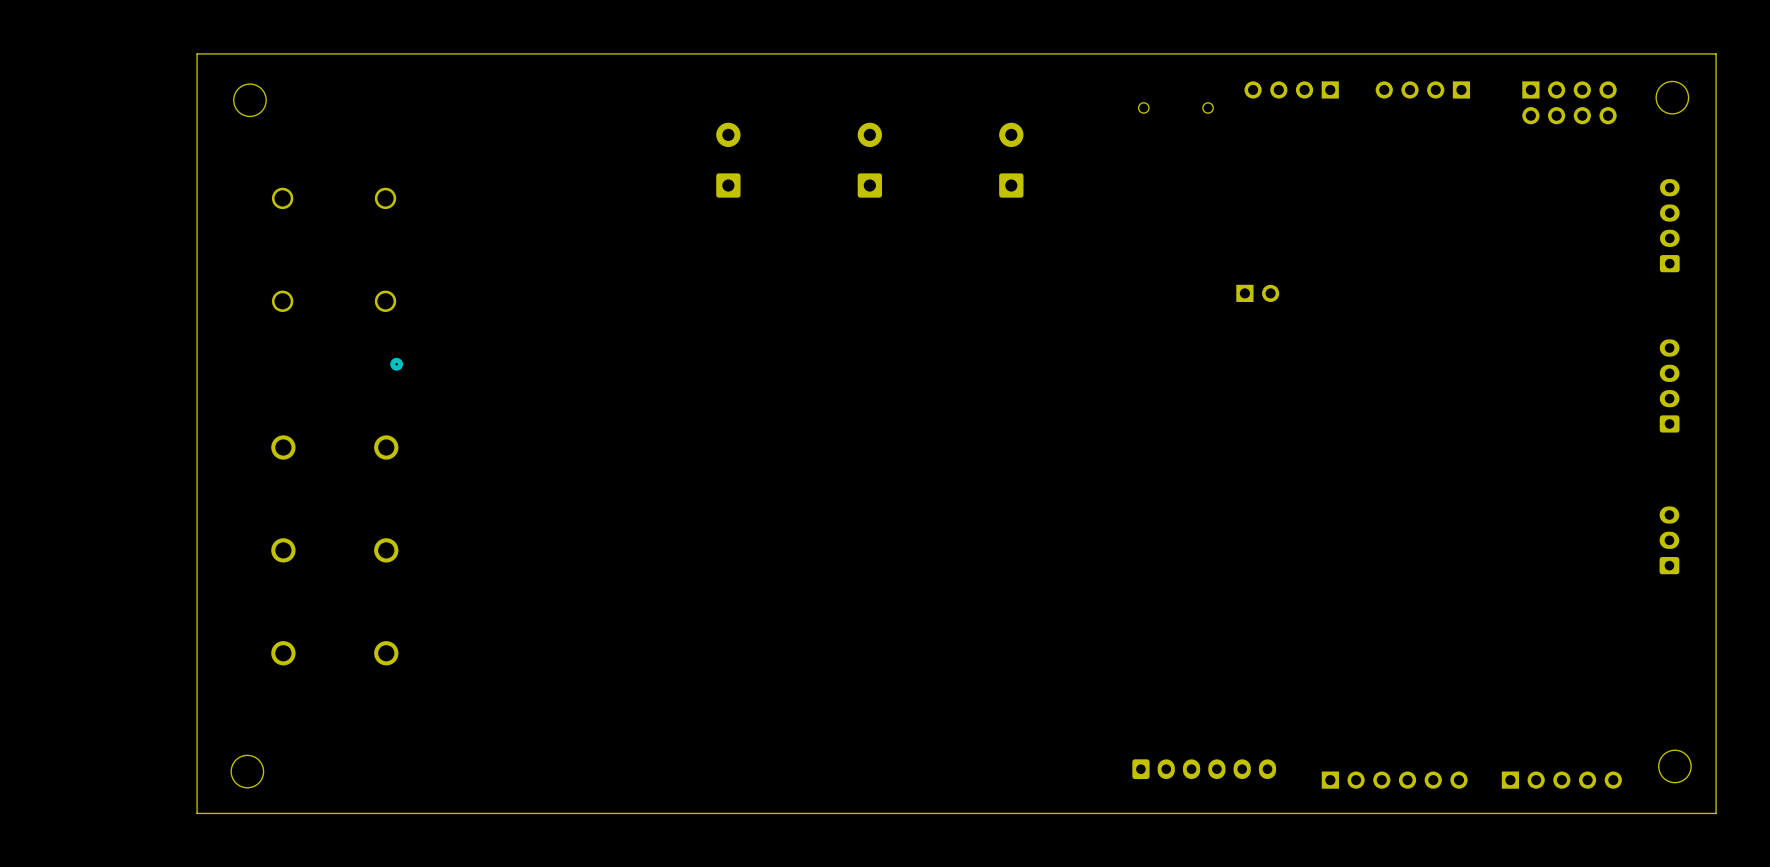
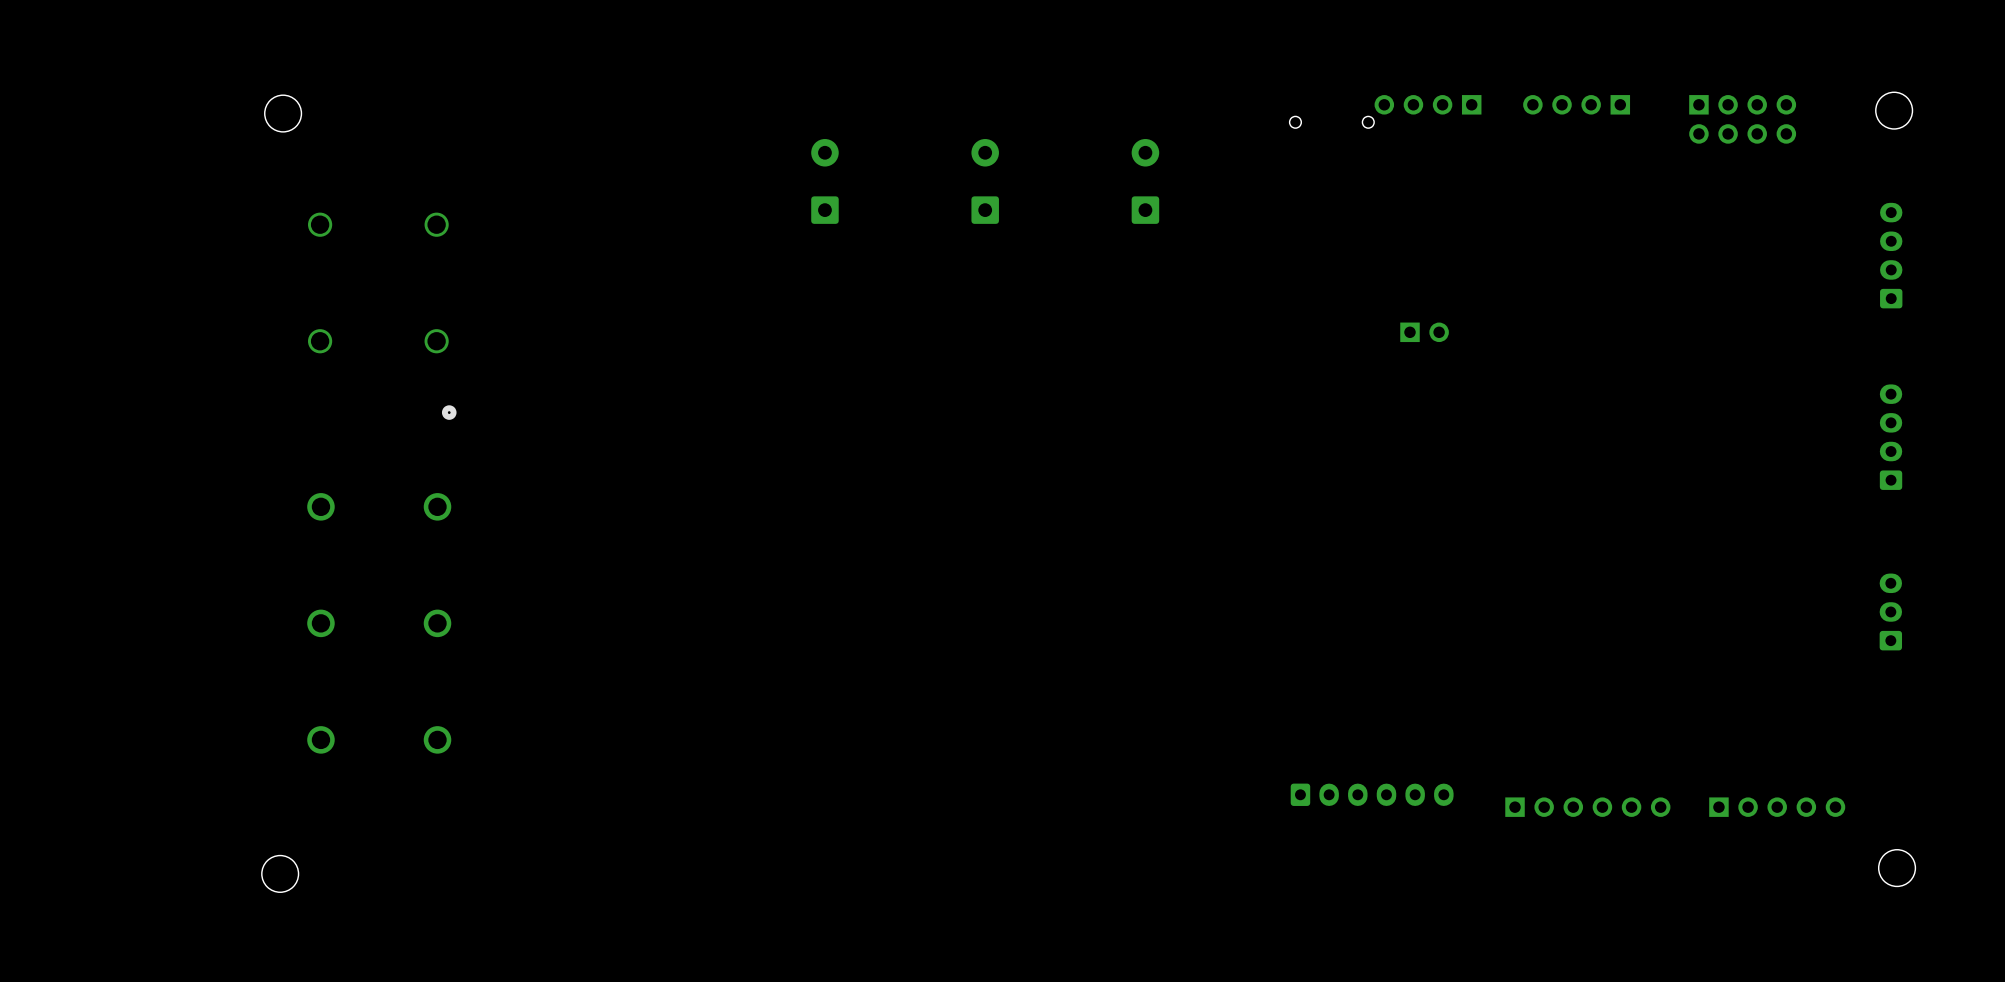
board edge: (1716, 53) (197, 53) (197, 813) (1716, 813) (1716, 53) -> none
part position: (1291, 89) -> (1428, 104)
part position: (1422, 89) -> (1576, 104)
part position: (1569, 102) -> (1742, 119)
part position: (1204, 769) -> (1372, 794)
part position: (1394, 780) -> (1587, 807)
part position: (1561, 780) -> (1777, 807)

